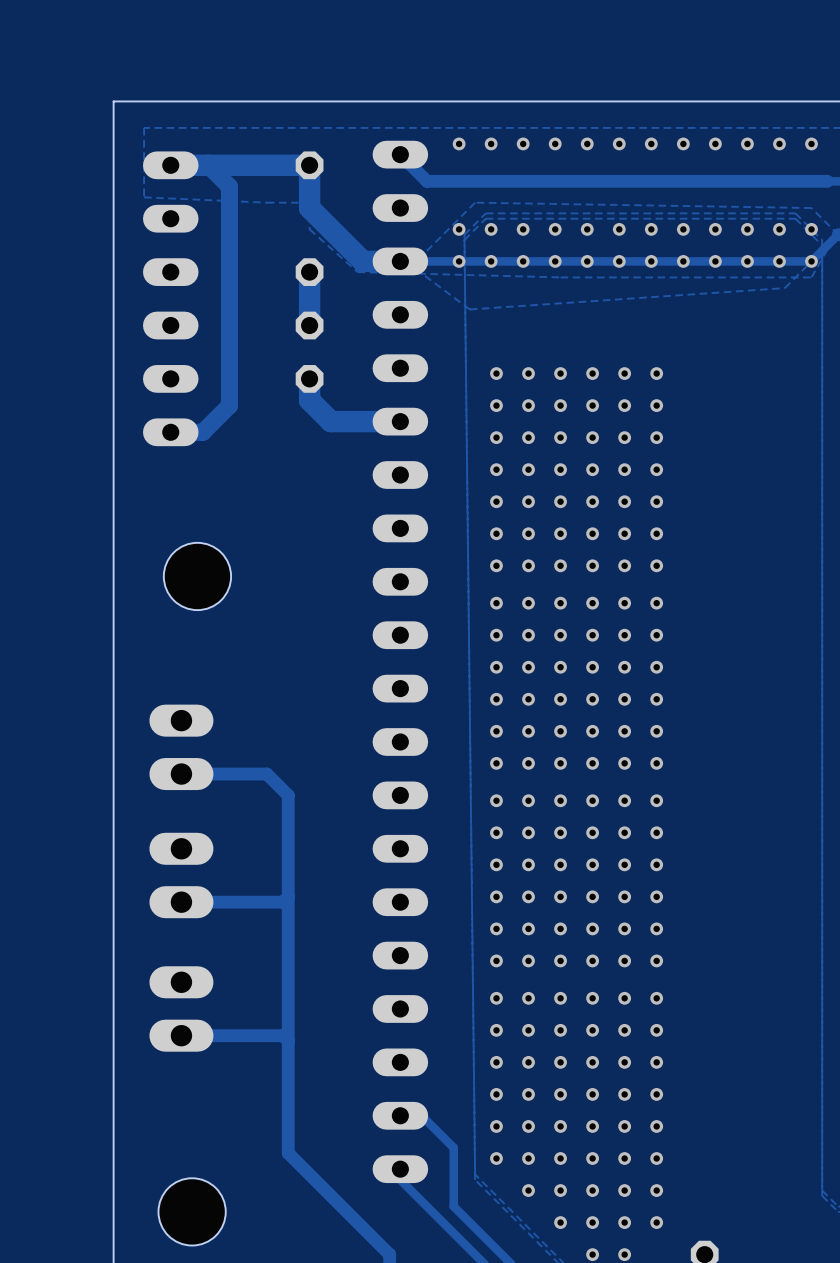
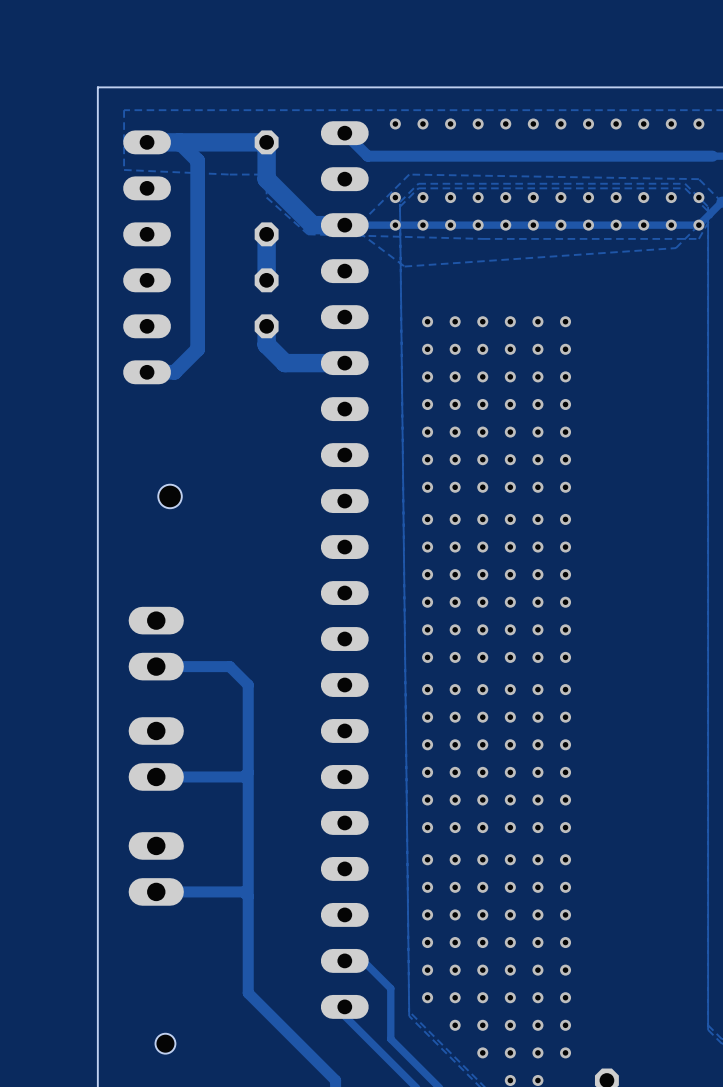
hole size: [163, 542, 232, 611] -> [158, 484, 182, 509]
hole size: [158, 1178, 226, 1246] -> [155, 1033, 176, 1054]

